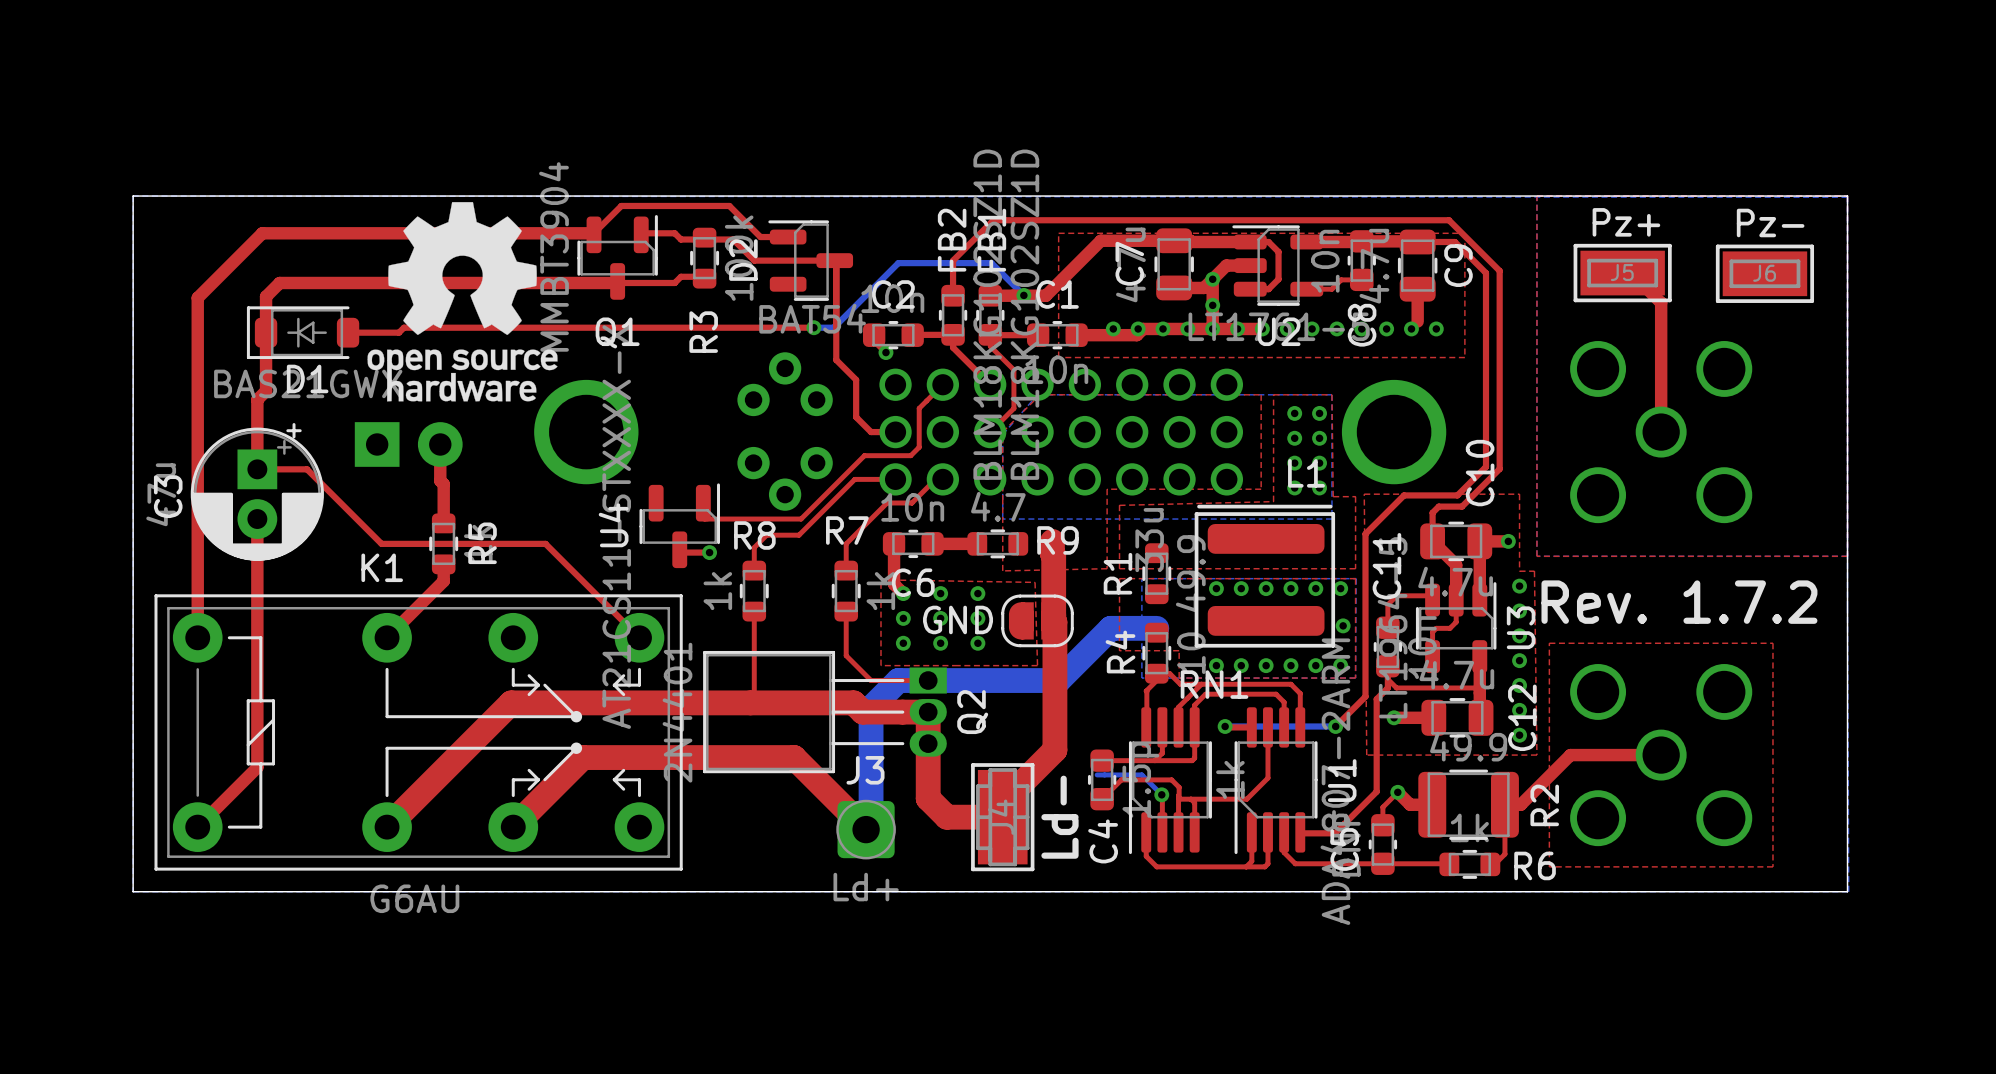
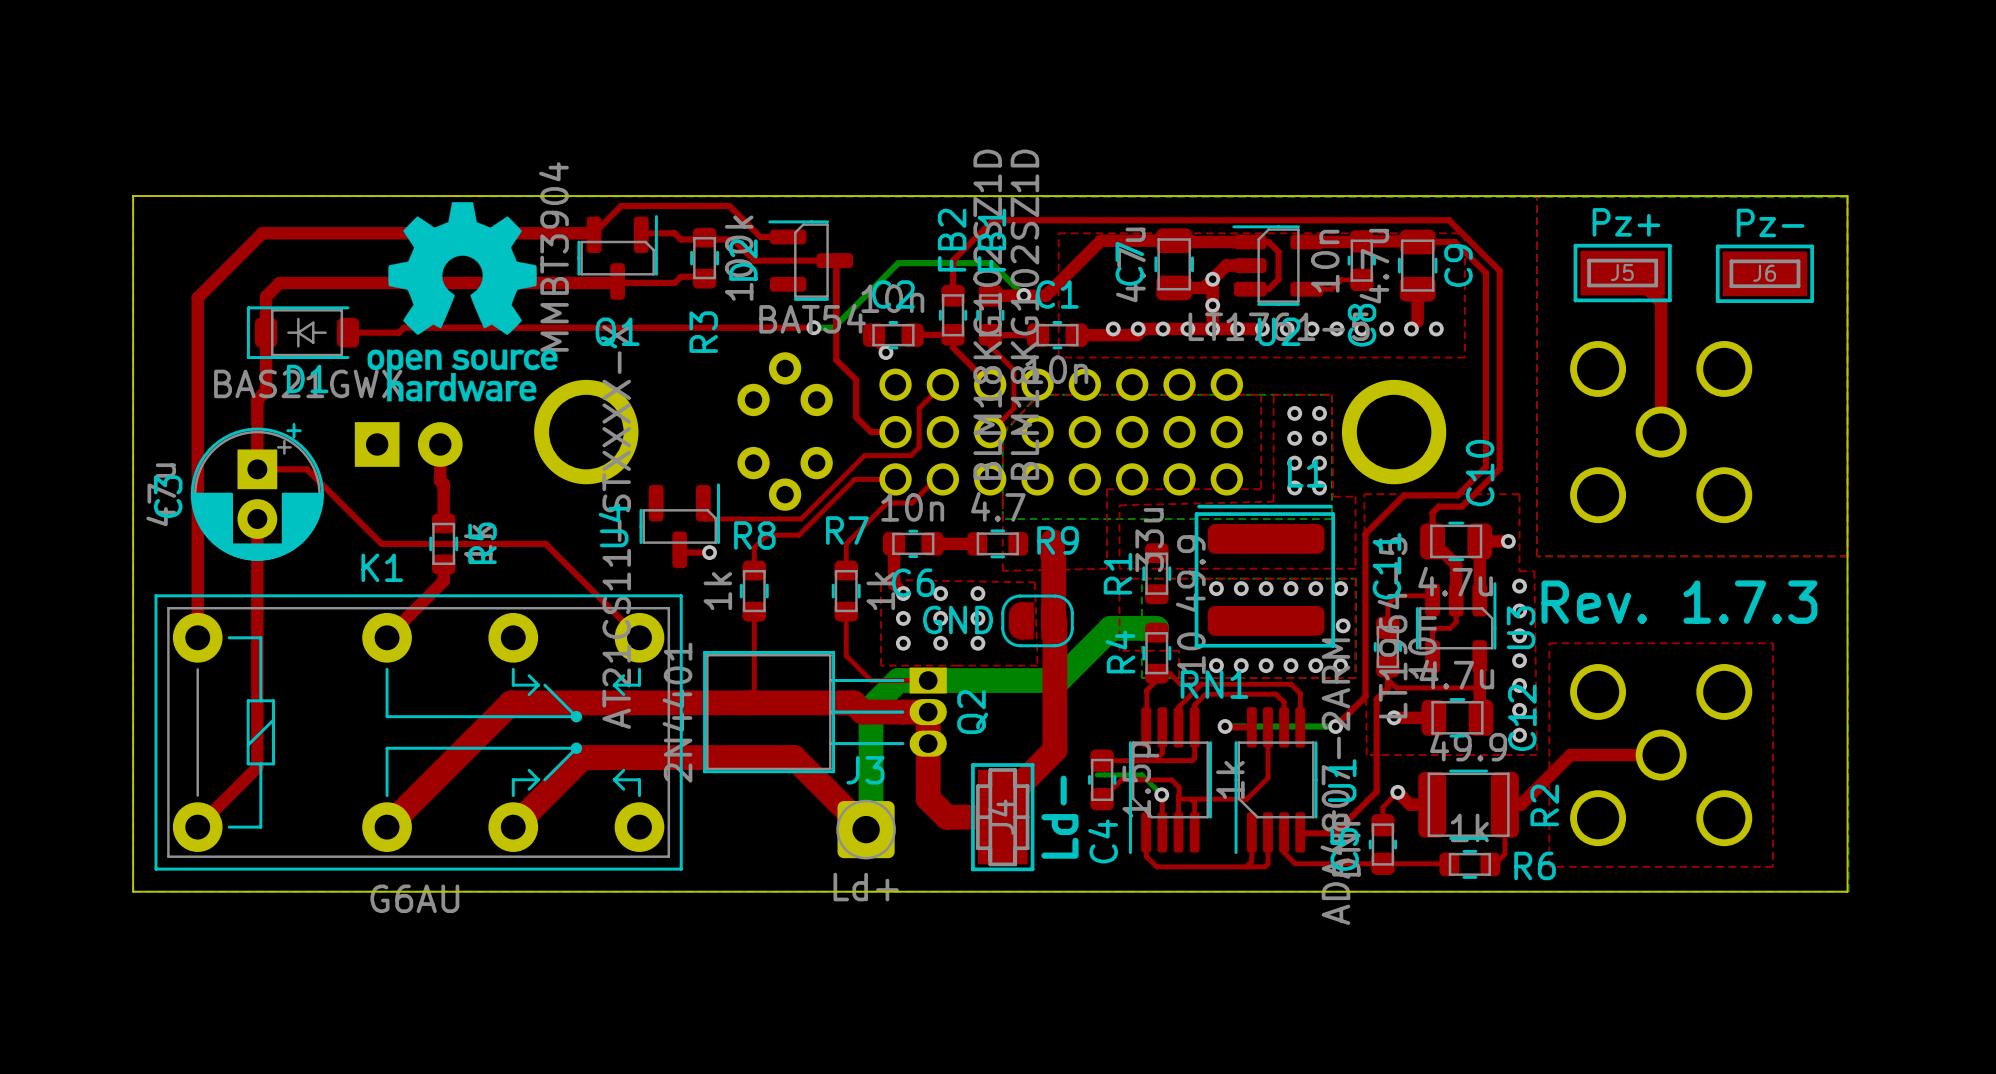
text: Rev. 1.7.2 (1679, 602) -> Rev. 1.7.3 (1679, 602)

